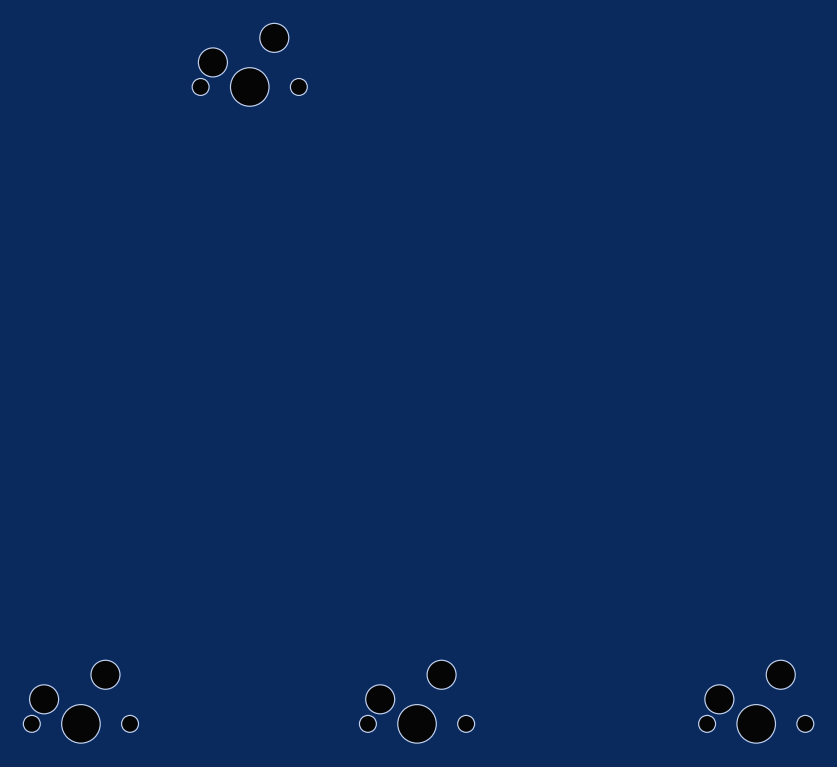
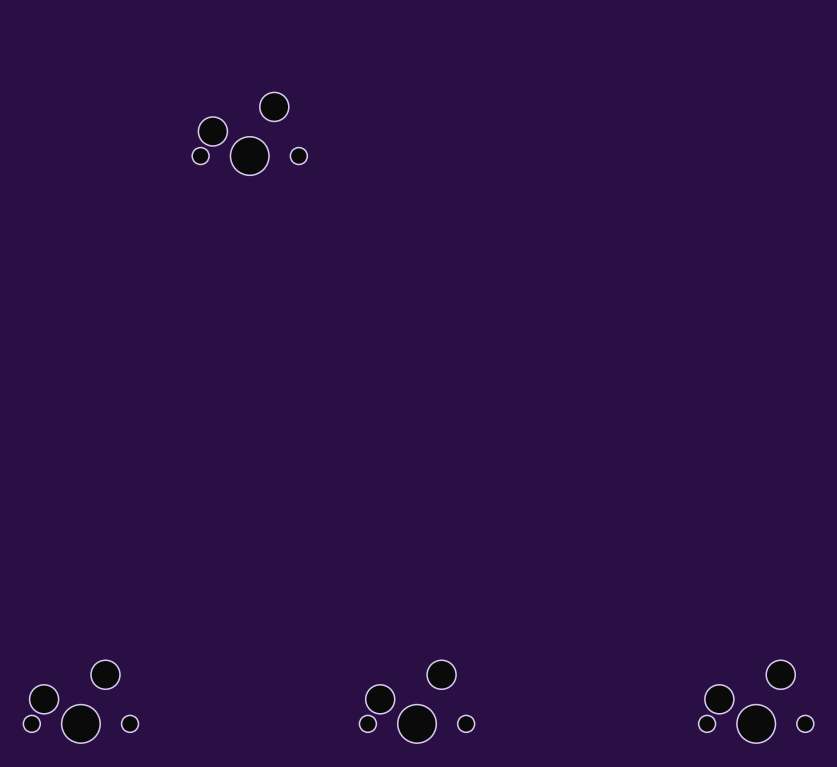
part position: (249, 64) -> (249, 133)

